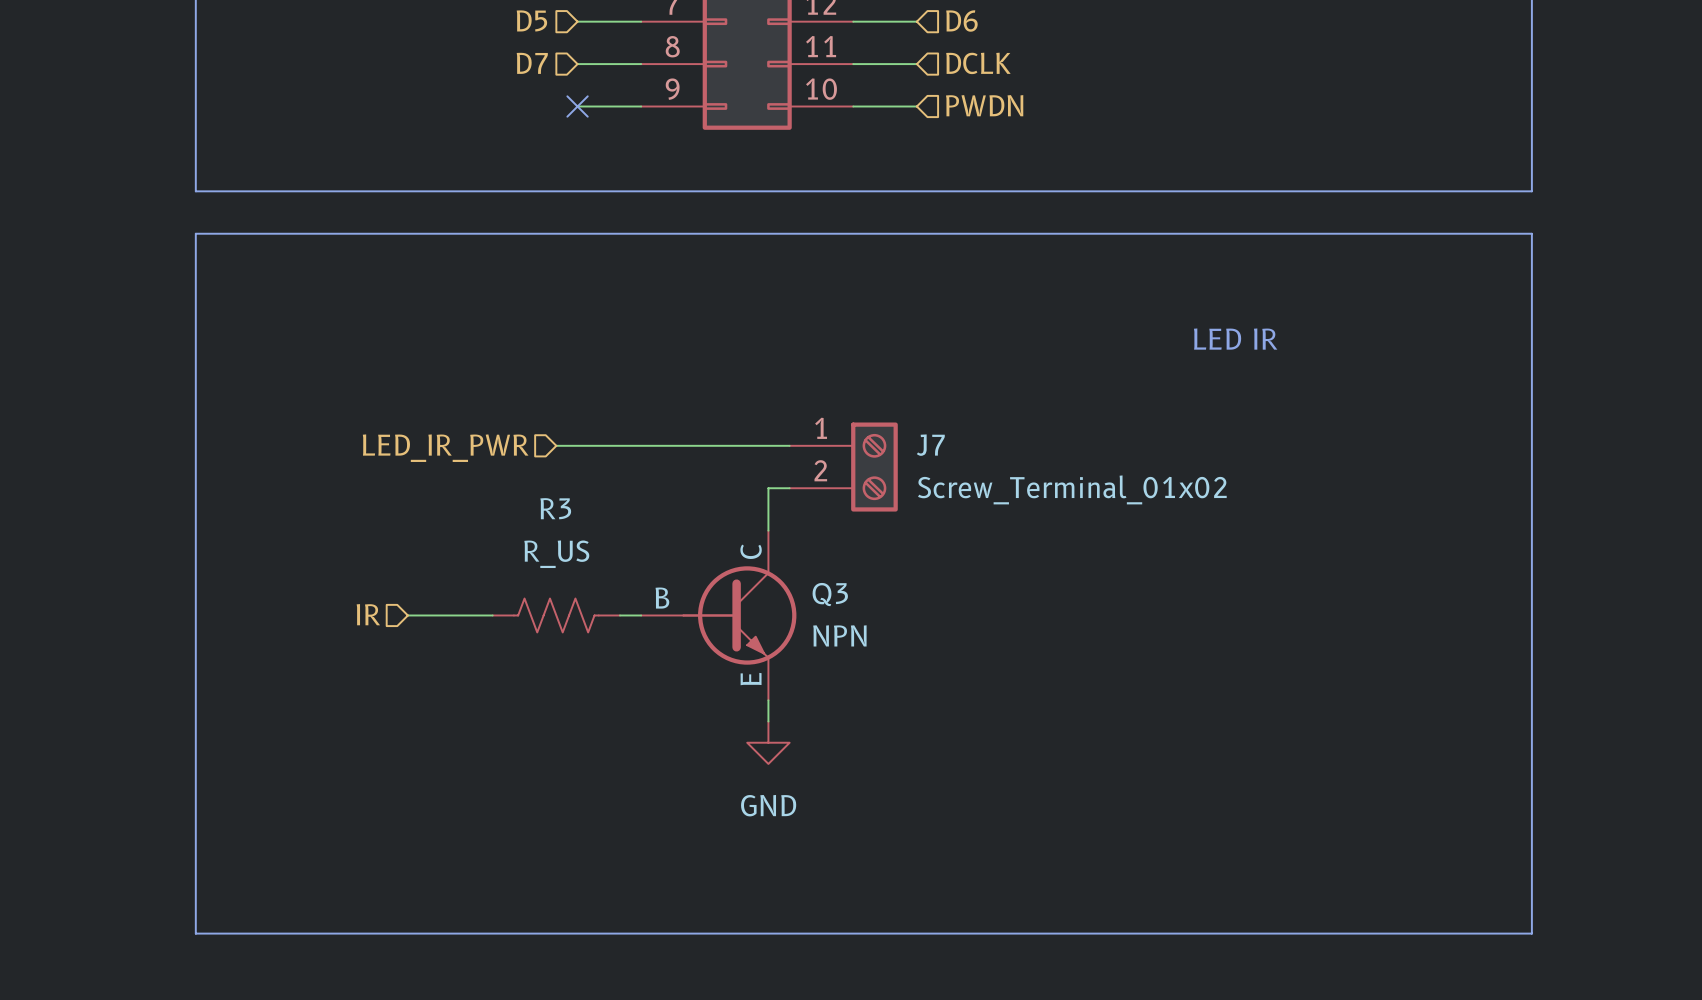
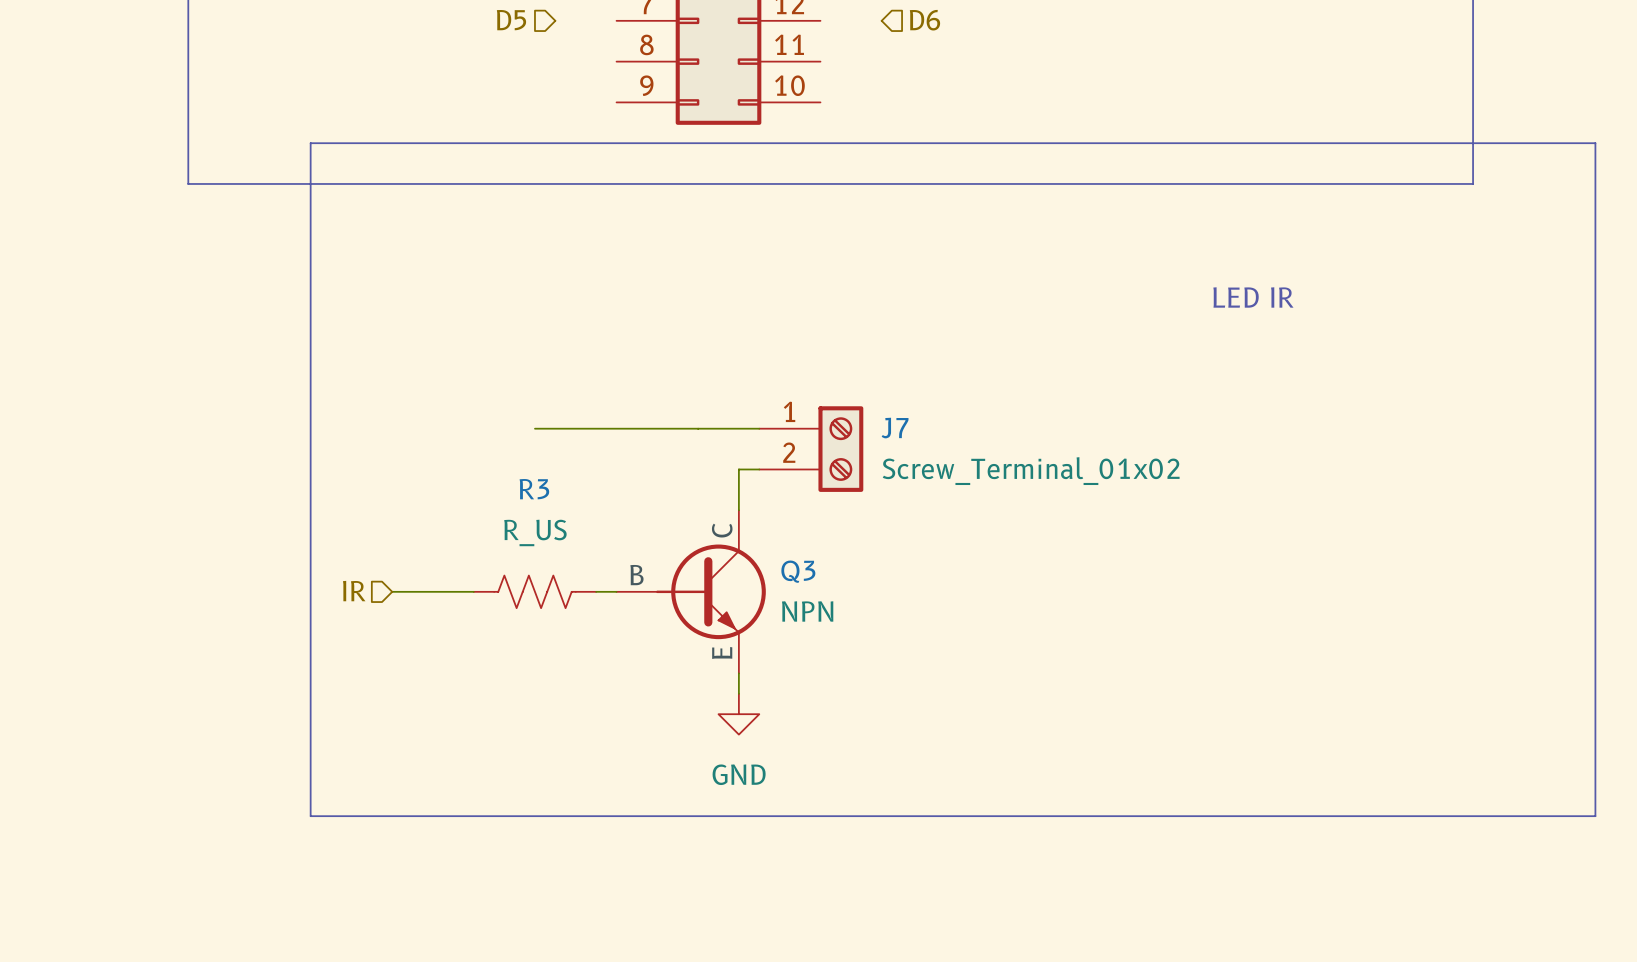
wire: (577, 21) (641, 21) -> none
wire: (853, 21) (916, 21) -> none
hierarchical label: D7 (532, 63) -> none
hierarchical label: DCLK (978, 63) -> none
wire: (577, 64) (641, 64) -> none
wire: (853, 64) (916, 64) -> none
hierarchical label: PWDN (984, 105) -> none
wire: (577, 106) (641, 106) -> none
no-connect mark: (577, 106) -> none
wire: (853, 106) (916, 106) -> none
line: (195, 233) (1531, 233) (1531, 933) (195, 933) (195, 233) -> (310, 143) (1595, 143) (1595, 816) (310, 816) (310, 143)
text position: LED IR (1235, 339) -> LED IR (1253, 297)
hierarchical label: LED_IR_PWR (445, 448) -> none

